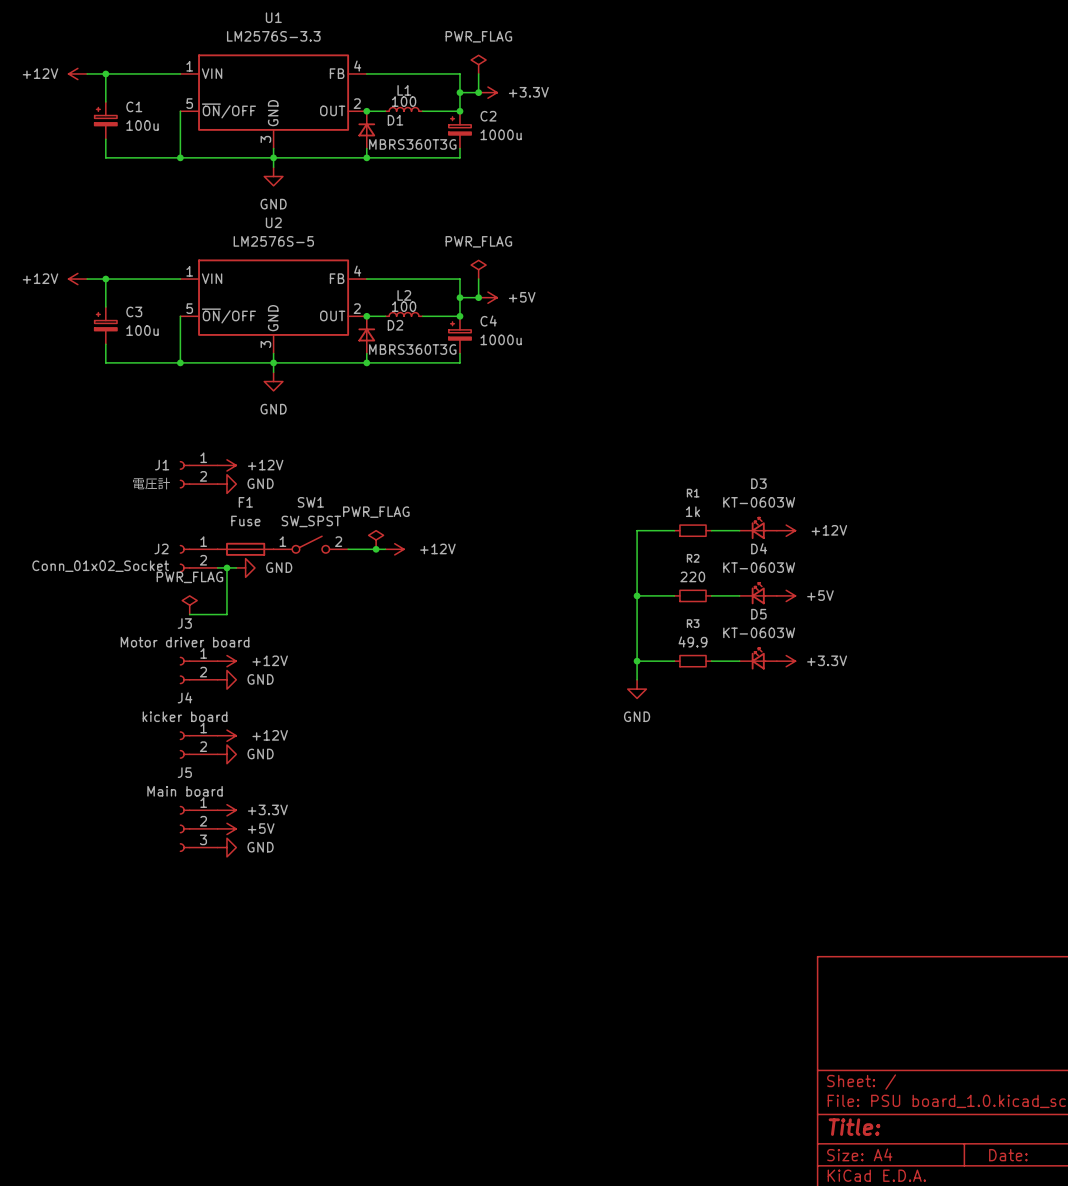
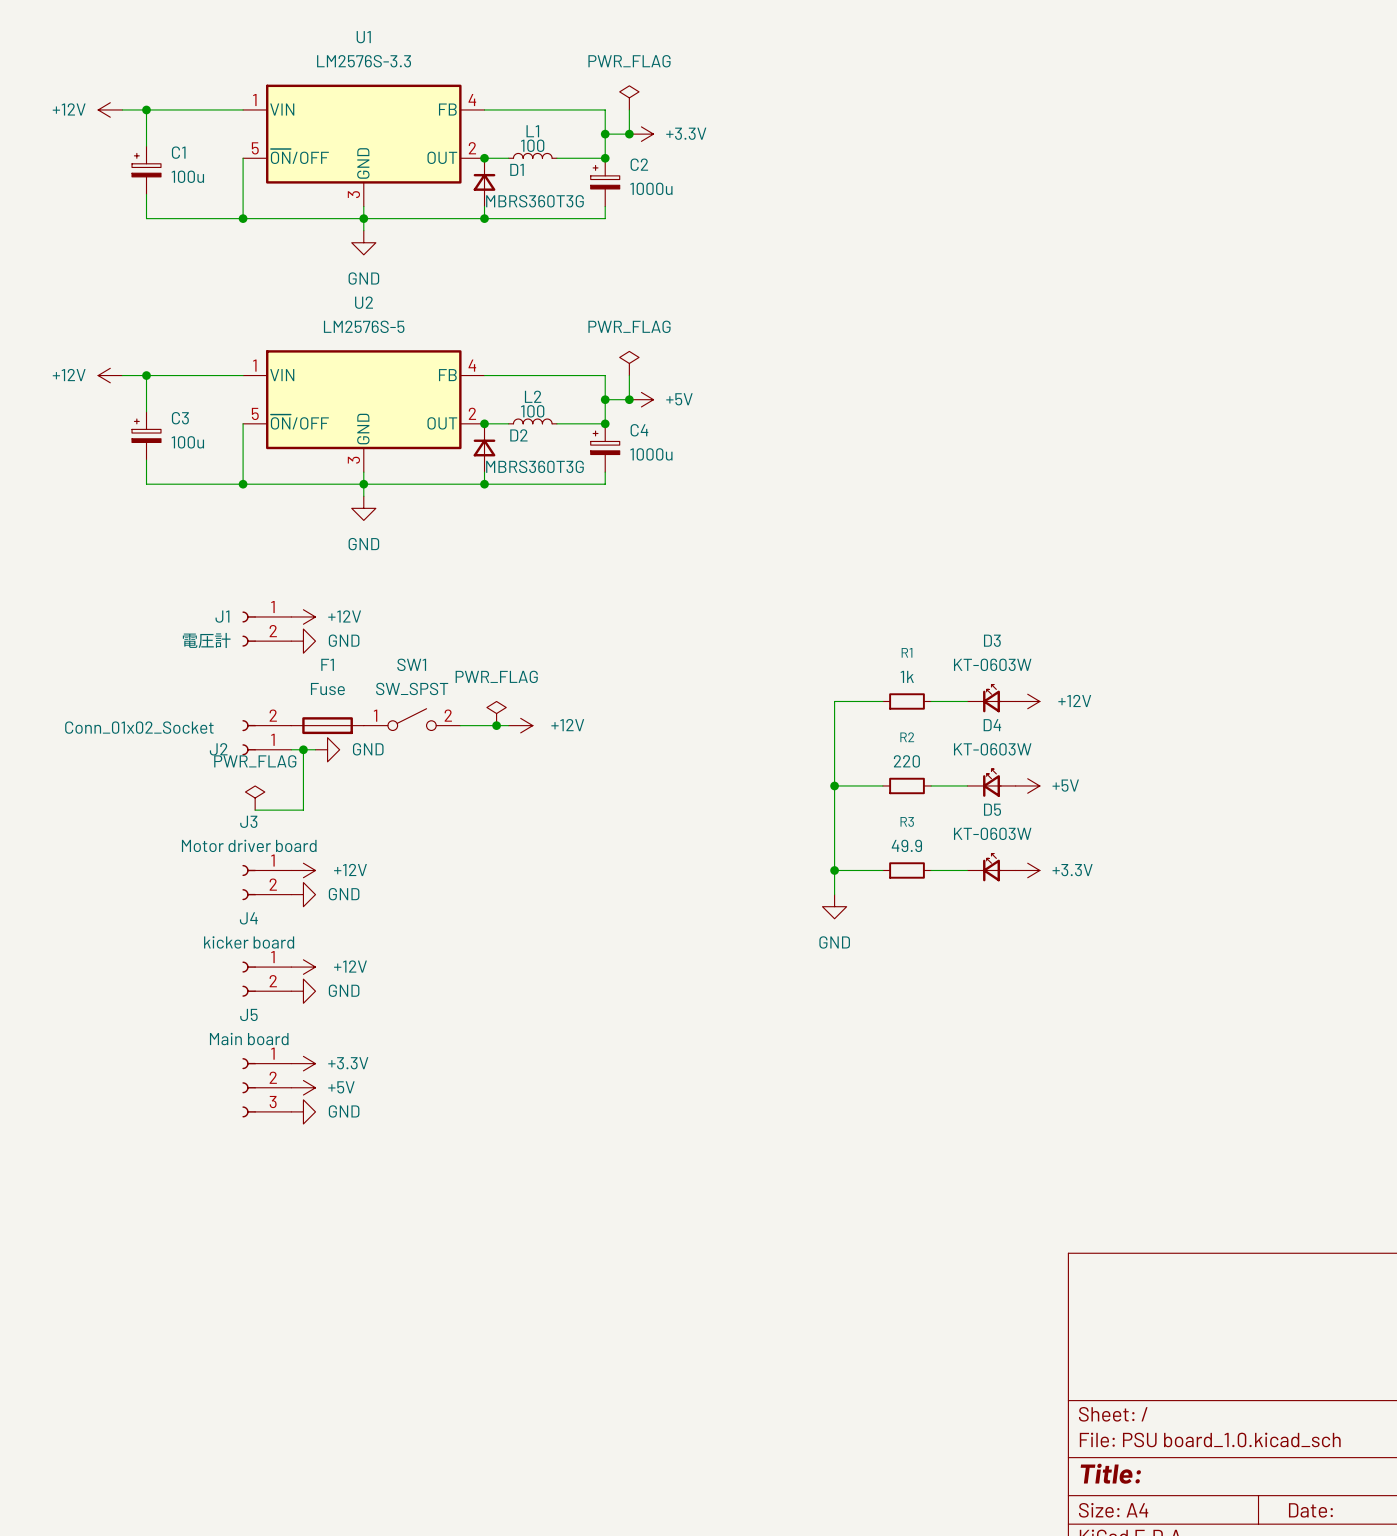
J2 flip: as is (185, 558) -> up-down (249, 737)

